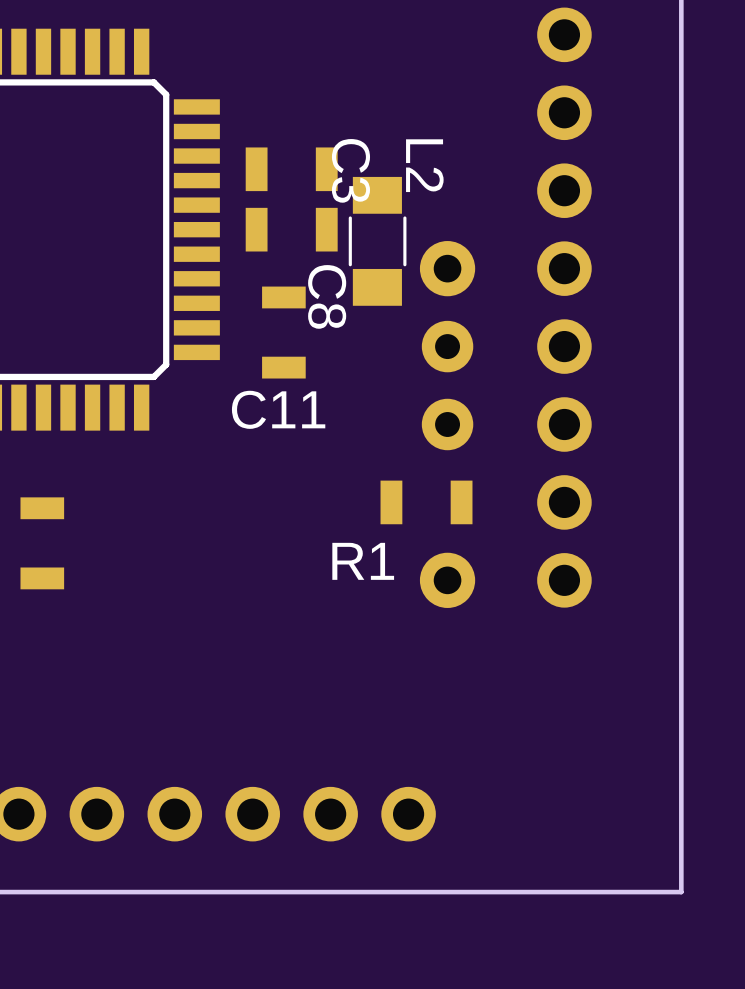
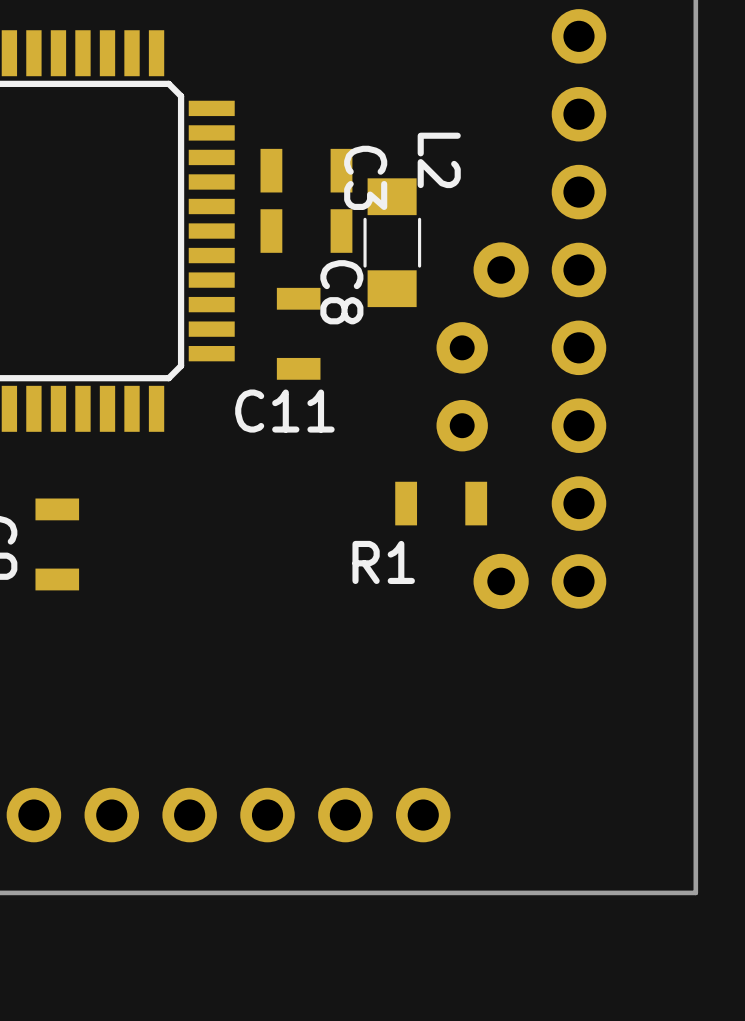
part position: (447, 268) -> (501, 269)
part position: (447, 580) -> (501, 581)

